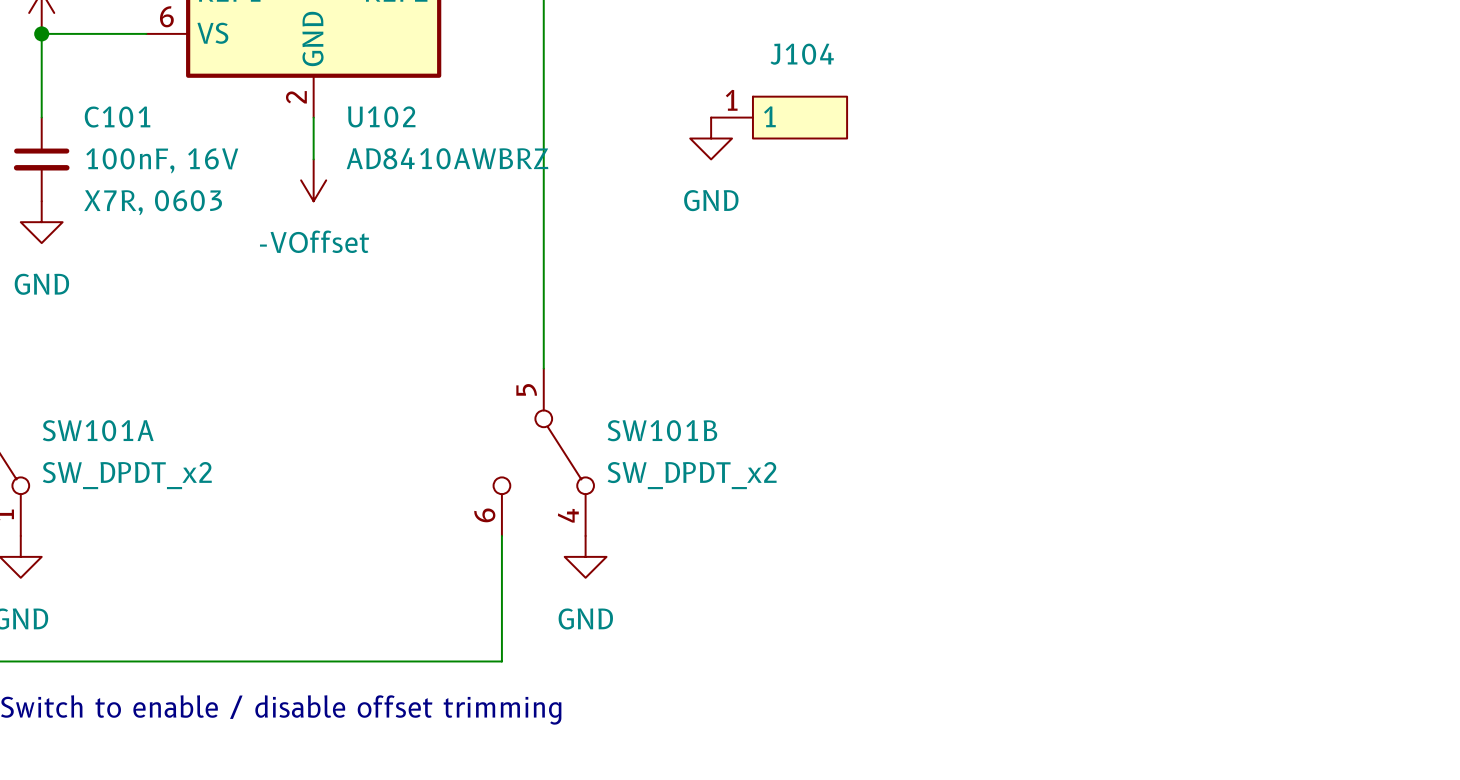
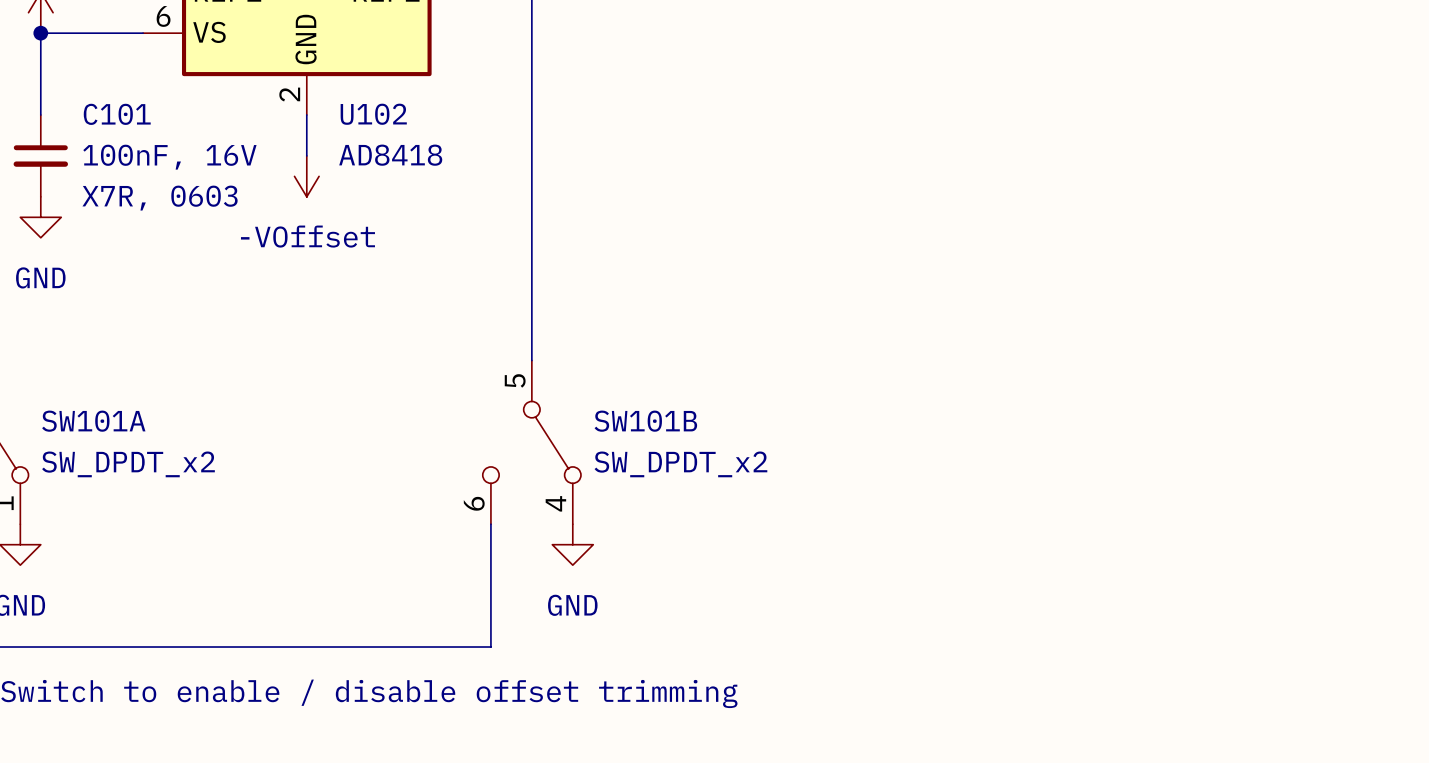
J104: (779, 117) -> none
power symbol: GND (711, 138) -> none
U102 value: AD8410AWBRZ (447, 158) -> AD8418 (390, 155)

